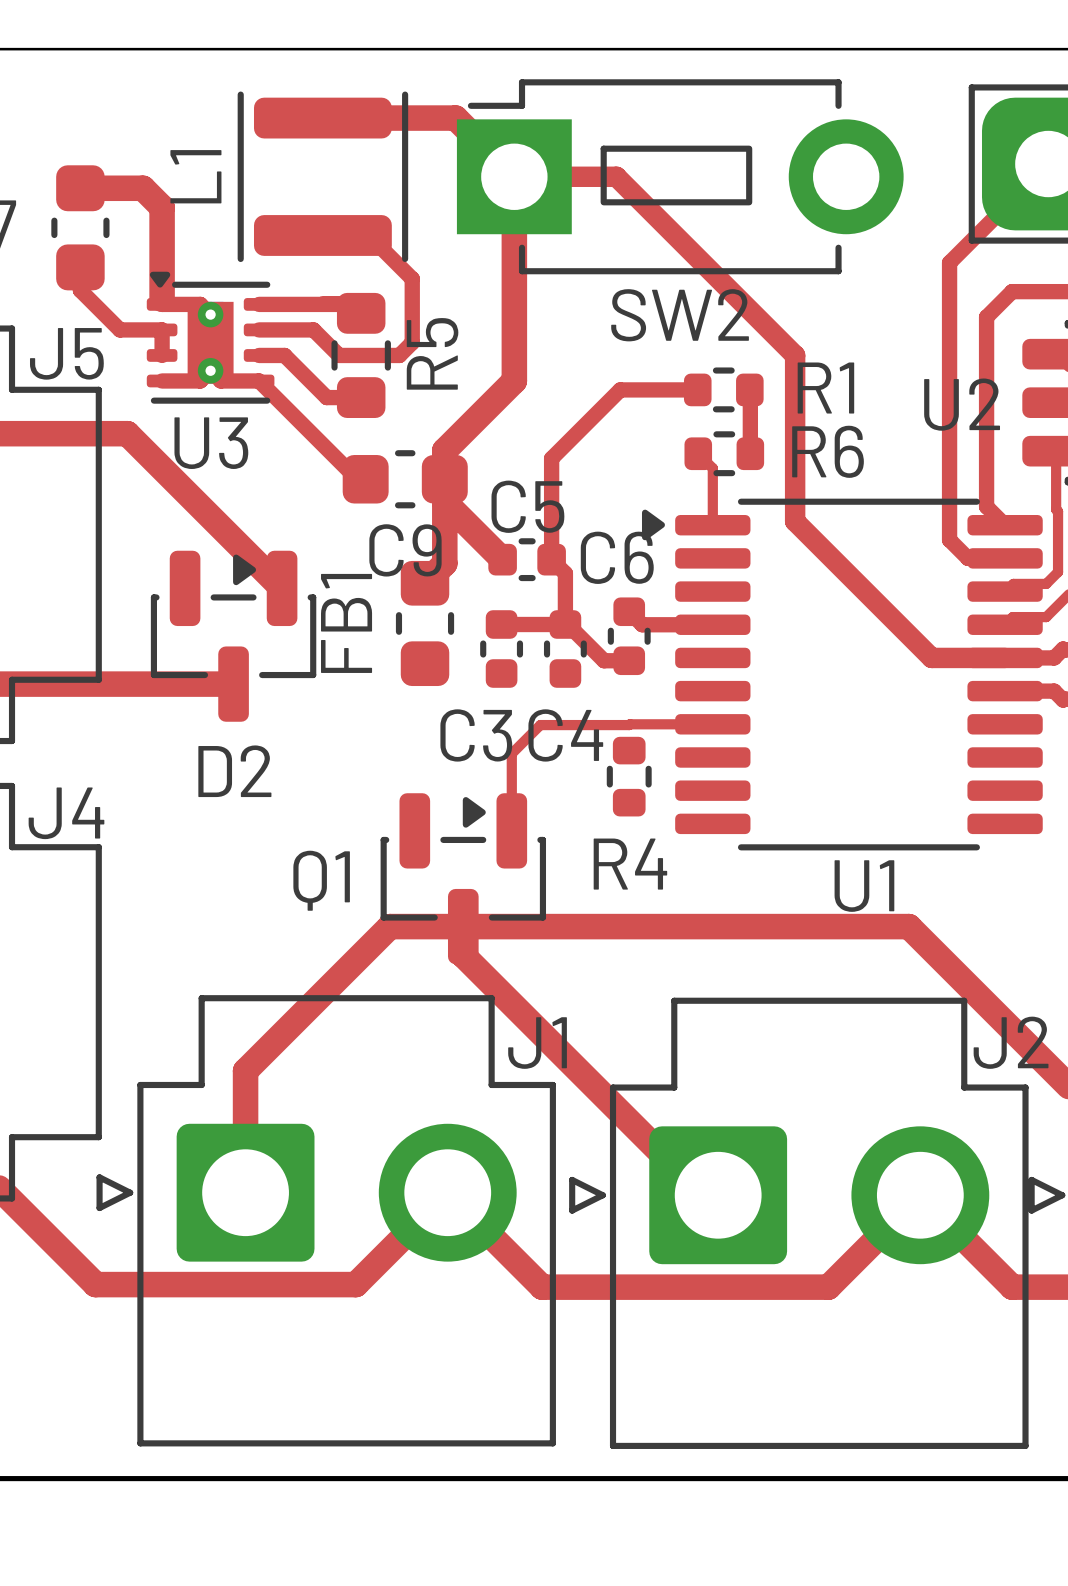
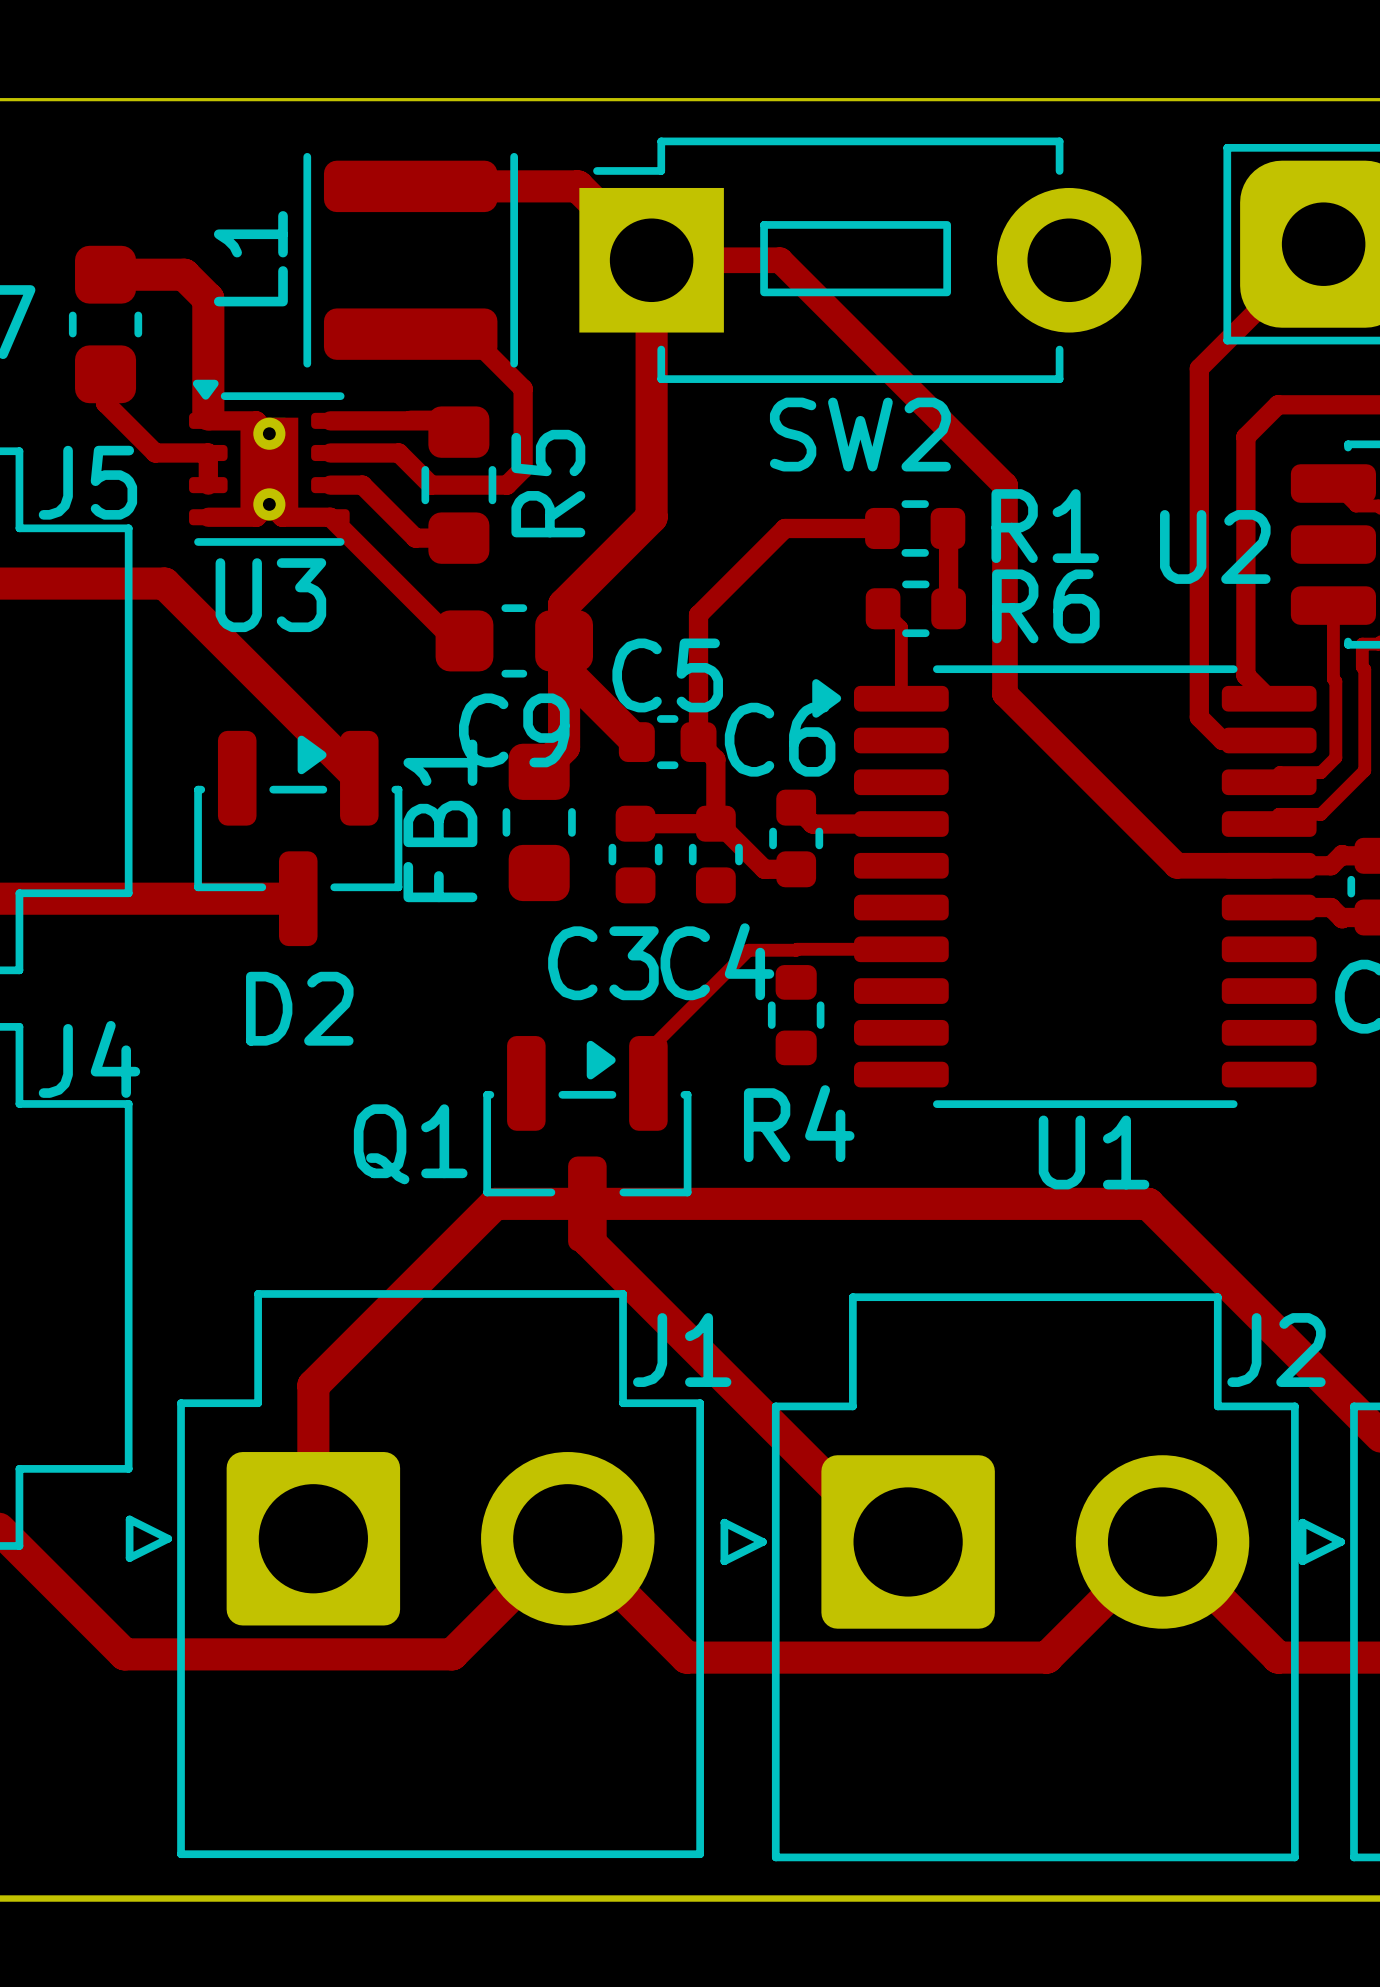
top track: (591, 725) (540, 725) (511, 753) (511, 804) -> (748, 950) (648, 1050)

